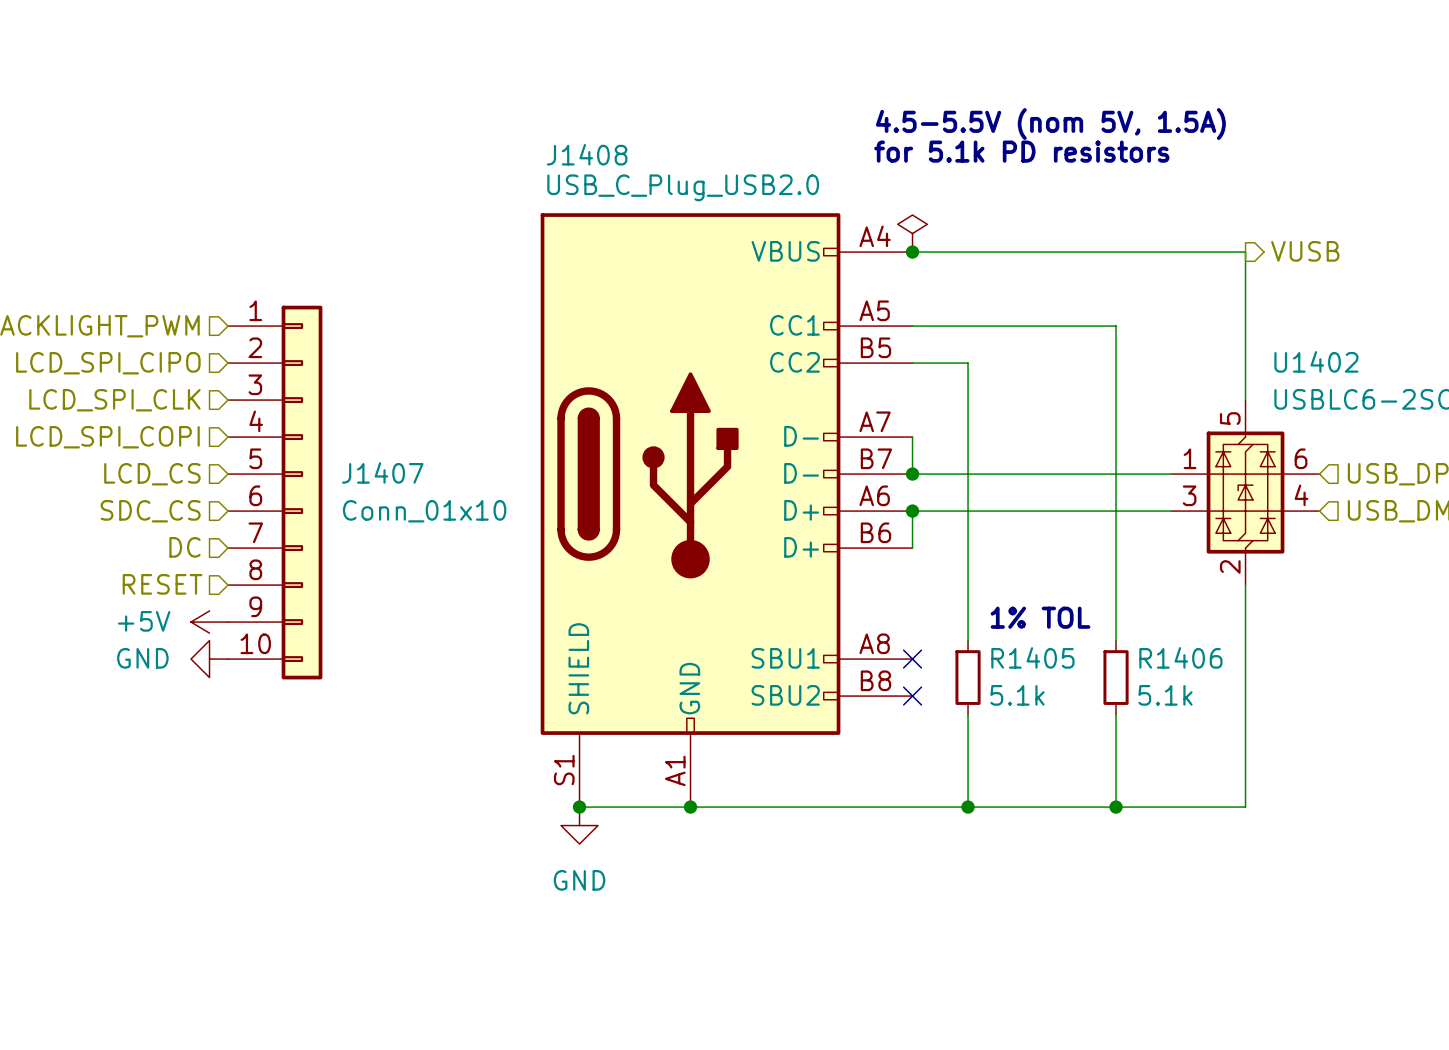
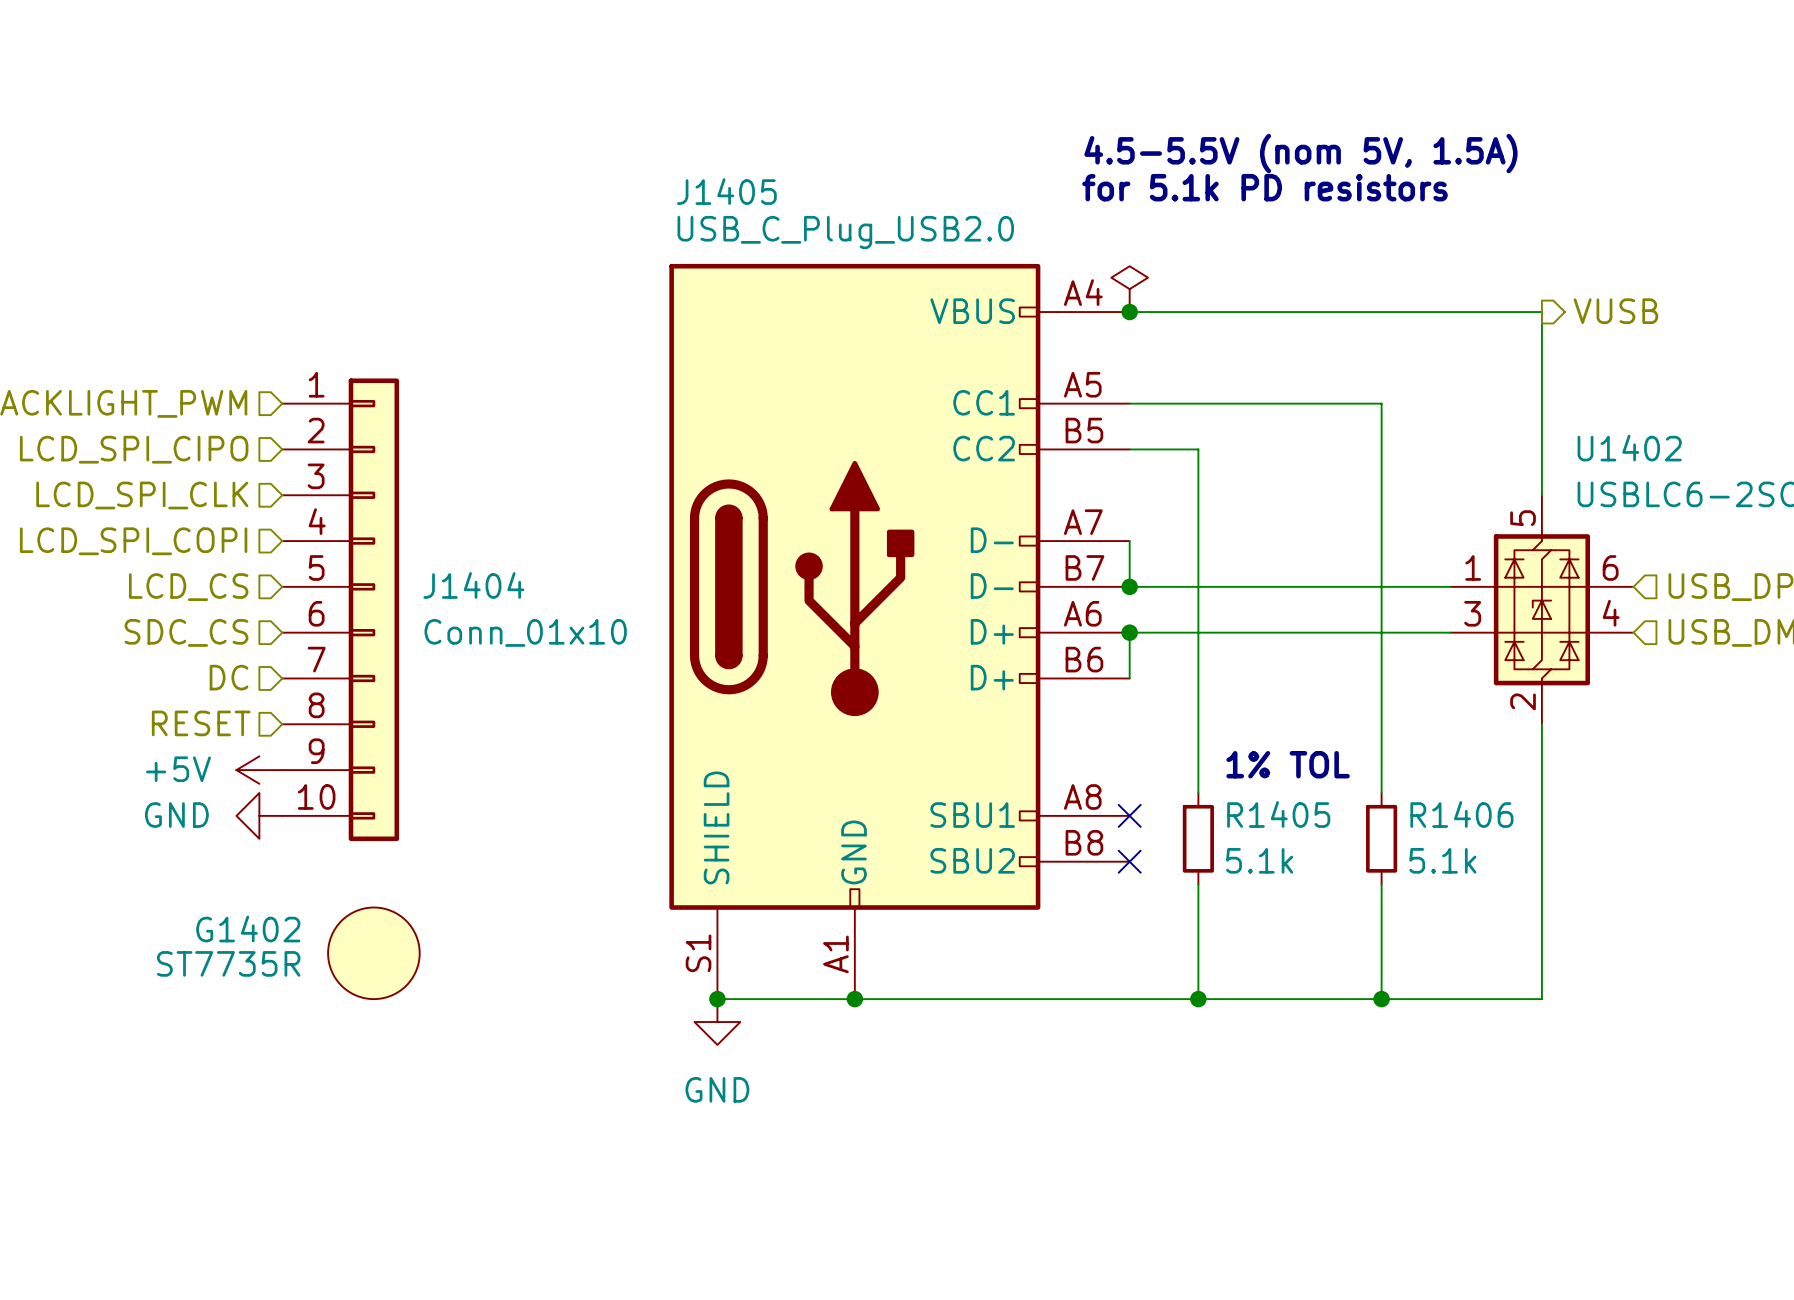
J1408 name: J1408 (587, 154) -> J1405 (726, 191)
J1407 name: J1407 (382, 472) -> J1404 (473, 585)
G1402: none -> ST7735R (373, 953)

